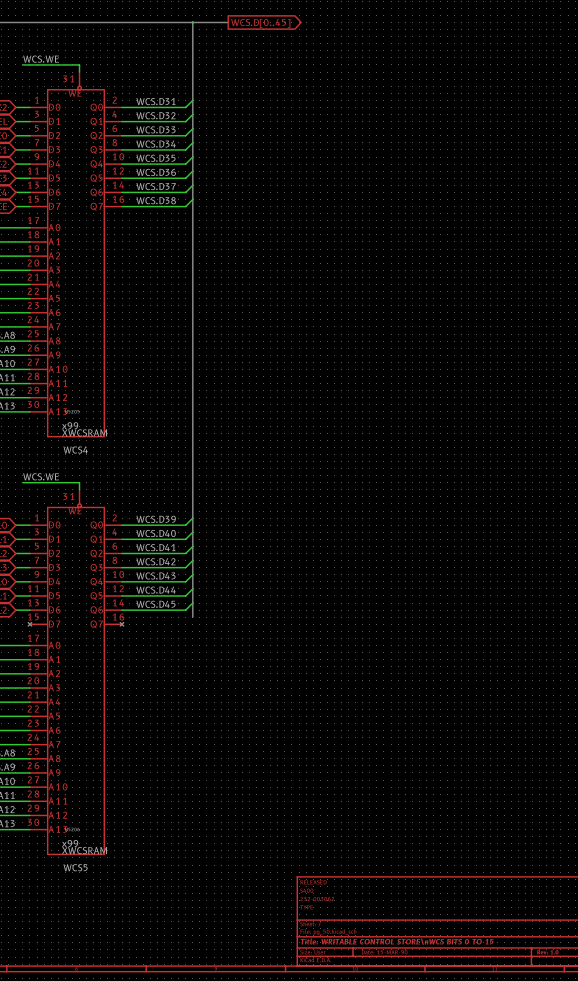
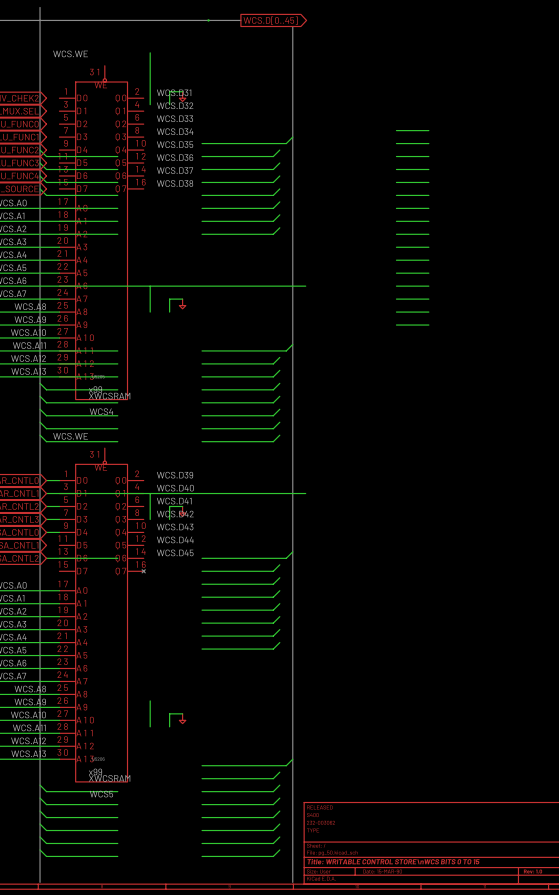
bus: none -> (40, 7) (40, 882)
bus: (192, 22) (192, 617) -> none
bus: none -> (292, 26) (292, 882)
wire: none -> (150, 52) (150, 104)
wire: (22, 64) (79, 64) (79, 72) -> none
wire: none -> (182, 91) (169, 91) (169, 104)
wire: (192, 100) (185, 107) (122, 107) -> none
power symbol: none -> (182, 96)
wire: (15, 107) (29, 107) -> none
wire: (192, 114) (185, 121) (122, 121) -> none
wire: (15, 121) (29, 121) -> none
wire: (192, 128) (185, 135) (122, 135) -> none
wire: (15, 135) (29, 135) -> none
wire: (192, 142) (185, 149) (122, 149) -> none
wire: none -> (396, 130) (428, 130)
wire: (15, 149) (29, 149) -> none
wire: none -> (292, 137) (286, 143) (202, 143)
wire: (192, 157) (185, 164) (122, 164) -> none
wire: none -> (396, 143) (428, 143)
wire: none -> (40, 150) (46, 156) (117, 156)
wire: (15, 164) (29, 164) -> none
wire: none -> (279, 150) (273, 156) (202, 156)
wire: (192, 171) (185, 178) (122, 178) -> none
wire: none -> (396, 156) (428, 156)
wire: none -> (40, 163) (46, 169) (117, 169)
wire: (15, 178) (29, 178) -> none
wire: none -> (279, 163) (273, 169) (202, 169)
wire: (192, 185) (185, 192) (122, 192) -> none
wire: none -> (396, 169) (428, 169)
wire: none -> (40, 175) (46, 182) (117, 182)
wire: (15, 192) (29, 192) -> none
wire: none -> (279, 175) (273, 182) (202, 182)
wire: (192, 199) (185, 206) (122, 206) -> none
wire: none -> (396, 182) (428, 182)
wire: none -> (40, 188) (46, 195) (117, 195)
wire: (15, 206) (29, 206) -> none
wire: none -> (279, 188) (273, 195) (202, 195)
wire: none -> (396, 195) (428, 195)
wire: none -> (279, 201) (273, 208) (202, 208)
wire: none -> (59, 208) (117, 208)
wire: none -> (396, 208) (428, 208)
wire: none -> (279, 214) (273, 221) (202, 221)
wire: none -> (59, 221) (117, 221)
wire: none -> (396, 221) (428, 221)
wire: none -> (279, 227) (273, 234) (202, 234)
wire: none -> (59, 234) (117, 234)
wire: none -> (396, 234) (428, 234)
wire: none -> (396, 247) (428, 247)
wire: none -> (396, 260) (428, 260)
wire: none -> (396, 273) (428, 273)
wire: none -> (59, 286) (305, 286)
wire: none -> (150, 286) (150, 312)
wire: none -> (396, 286) (428, 286)
wire: none -> (182, 299) (169, 299) (169, 312)
wire: none -> (396, 299) (428, 299)
power symbol: none -> (182, 304)
wire: none -> (396, 312) (428, 312)
wire: none -> (396, 325) (428, 325)
wire: none -> (292, 344) (286, 350) (202, 350)
wire: none -> (59, 350) (117, 350)
wire: none -> (279, 357) (273, 363) (202, 363)
wire: none -> (59, 363) (117, 363)
wire: none -> (279, 370) (273, 376) (202, 376)
wire: none -> (59, 376) (117, 376)
wire: none -> (40, 383) (46, 389) (117, 389)
wire: none -> (279, 383) (273, 389) (202, 389)
wire: none -> (40, 396) (46, 402) (117, 402)
wire: none -> (279, 396) (273, 402) (202, 402)
wire: none -> (40, 409) (46, 415) (117, 415)
wire: none -> (279, 409) (273, 415) (202, 415)
wire: none -> (40, 422) (46, 428) (117, 428)
wire: none -> (279, 422) (273, 428) (202, 428)
wire: none -> (40, 435) (46, 441) (52, 441)
wire: none -> (279, 435) (273, 441) (202, 441)
wire: (79, 482) (79, 489) -> (104, 441) (117, 441)
wire: (192, 518) (185, 525) (122, 525) -> none
wire: (192, 532) (185, 539) -> (305, 493) (202, 493)
wire: none -> (59, 493) (143, 493)
wire: none -> (150, 493) (150, 519)
wire: (192, 546) (185, 553) (164, 553) -> none
wire: (122, 553) (150, 553) -> (169, 519) (169, 506)
power symbol: none -> (182, 511)
wire: (192, 560) (185, 567) (122, 567) -> none
wire: (192, 574) (185, 581) (122, 581) -> none
wire: (192, 588) (185, 595) (122, 595) -> none
wire: (15, 595) (29, 595) -> none
wire: (192, 603) (185, 610) (122, 610) -> none
wire: none -> (292, 551) (286, 558) (202, 558)
wire: none -> (59, 558) (117, 558)
wire: none -> (279, 564) (273, 571) (202, 571)
no-connect mark: (29, 624) -> none
wire: none -> (279, 577) (273, 584) (202, 584)
wire: none -> (279, 590) (273, 597) (202, 597)
wire: none -> (279, 603) (273, 610) (202, 610)
wire: none -> (279, 616) (273, 623) (202, 623)
wire: none -> (279, 629) (273, 636) (202, 636)
wire: none -> (279, 642) (273, 649) (202, 649)
wire: none -> (150, 700) (150, 726)
wire: none -> (182, 713) (169, 713) (169, 726)
power symbol: none -> (182, 718)
wire: none -> (292, 759) (286, 765) (202, 765)
wire: none -> (279, 772) (273, 778) (202, 778)
wire: none -> (40, 785) (46, 791) (117, 791)
wire: none -> (279, 785) (273, 791) (202, 791)
wire: none -> (40, 798) (46, 804) (117, 804)
wire: none -> (279, 798) (273, 804) (202, 804)
wire: none -> (40, 811) (46, 817) (117, 817)
wire: none -> (279, 811) (273, 817) (202, 817)
wire: none -> (40, 824) (46, 830) (117, 830)
wire: none -> (279, 824) (273, 830) (202, 830)
wire: none -> (40, 837) (46, 843) (117, 843)
wire: none -> (279, 837) (273, 843) (202, 843)
wire: none -> (40, 849) (46, 856) (117, 856)
wire: none -> (279, 849) (273, 856) (202, 856)

